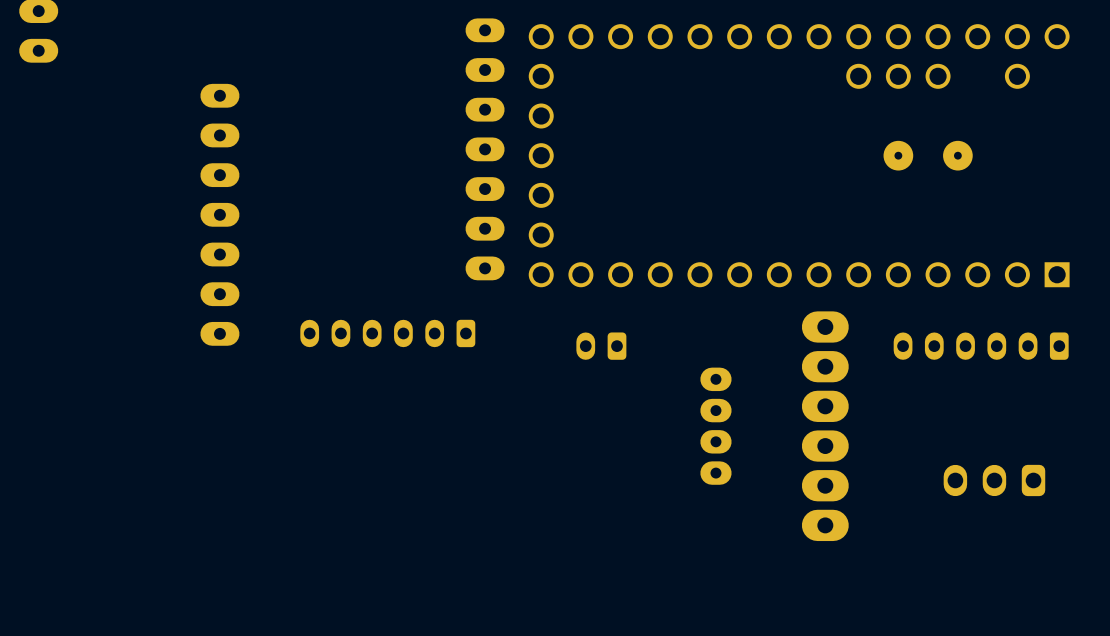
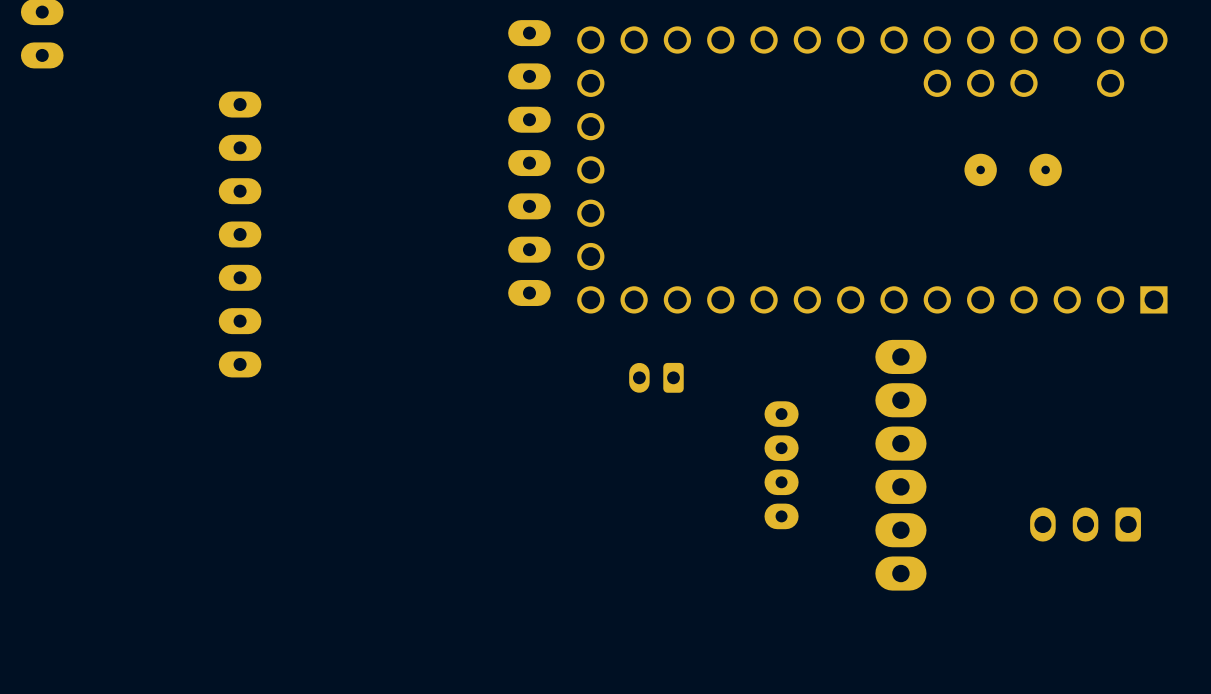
part: (387, 333) -> none
part: (981, 346) -> none

